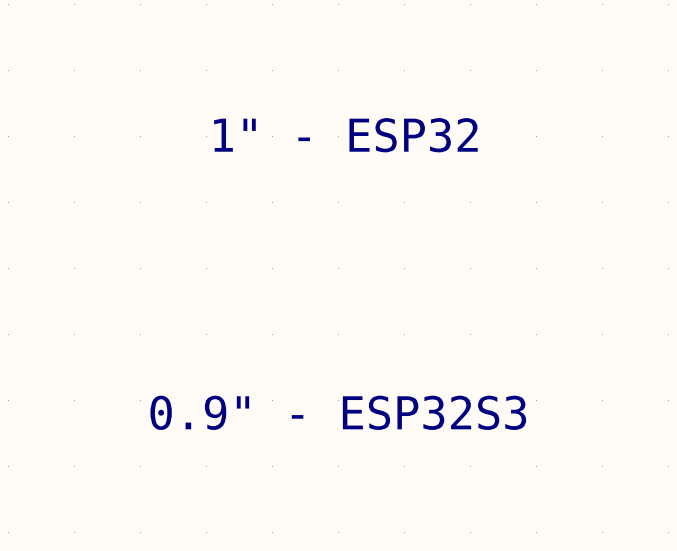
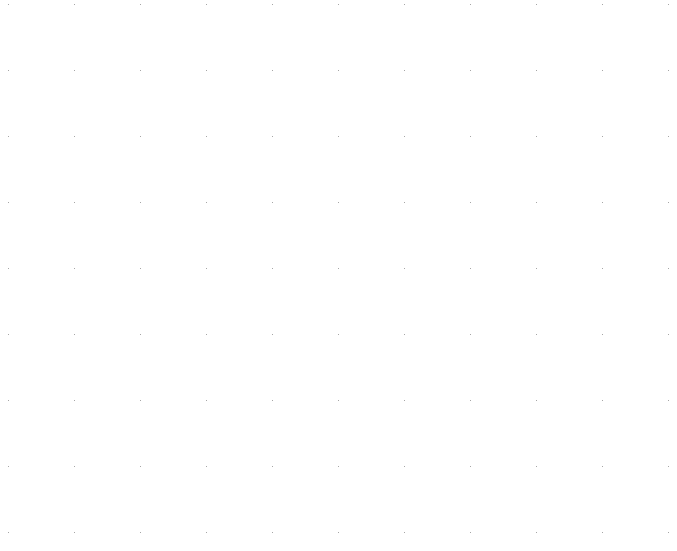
text: 1" - ESP32 (345, 135) -> none
text: 0.9" - ESP32S3 (338, 412) -> none

